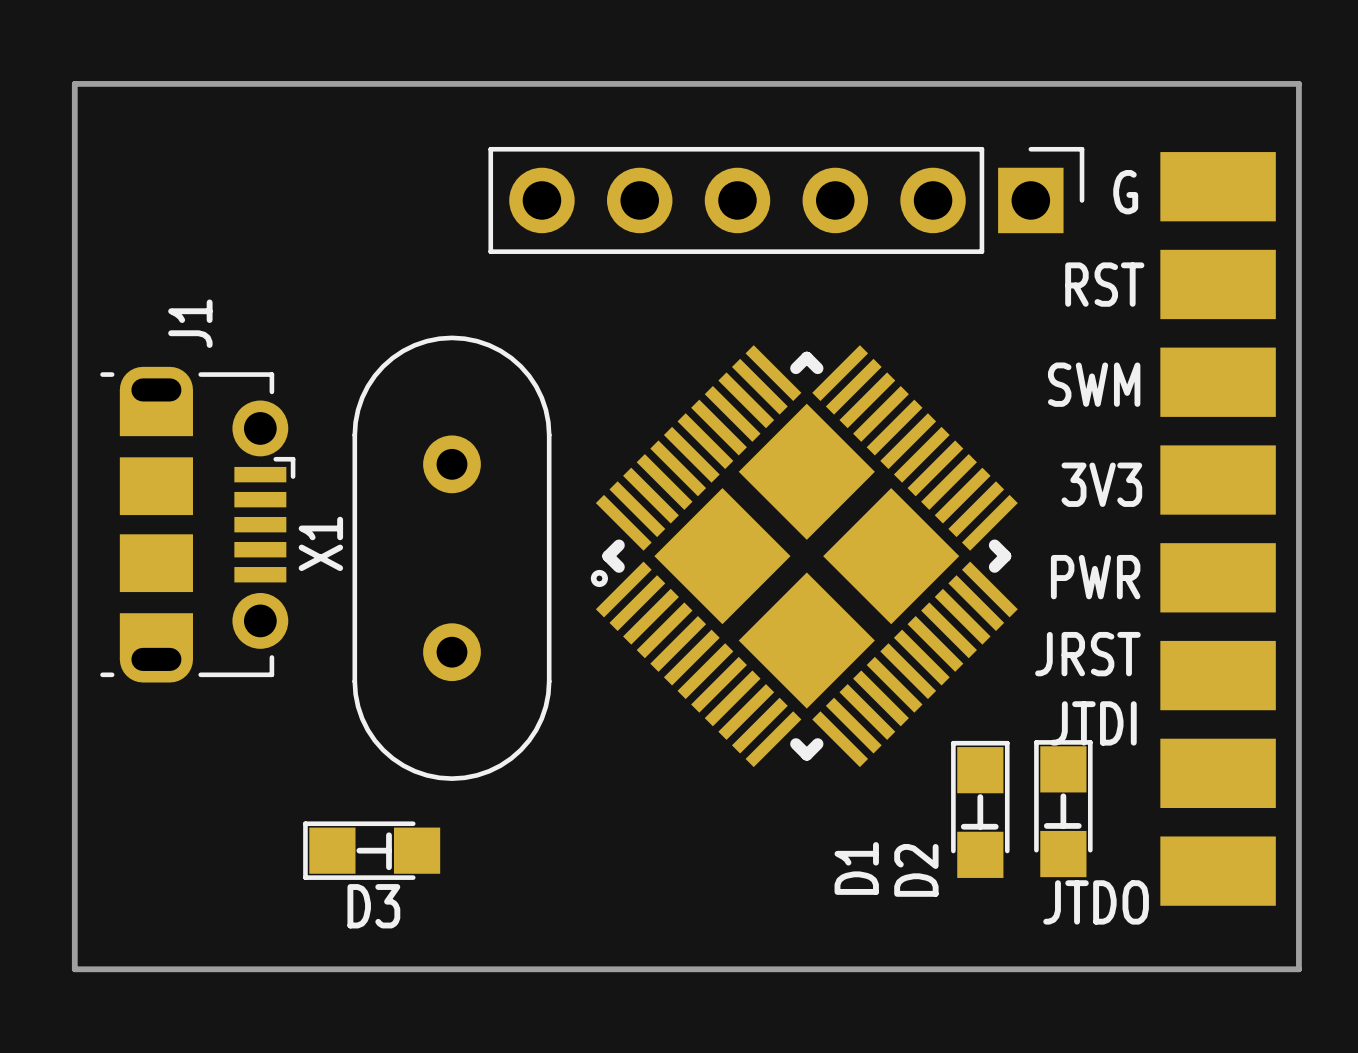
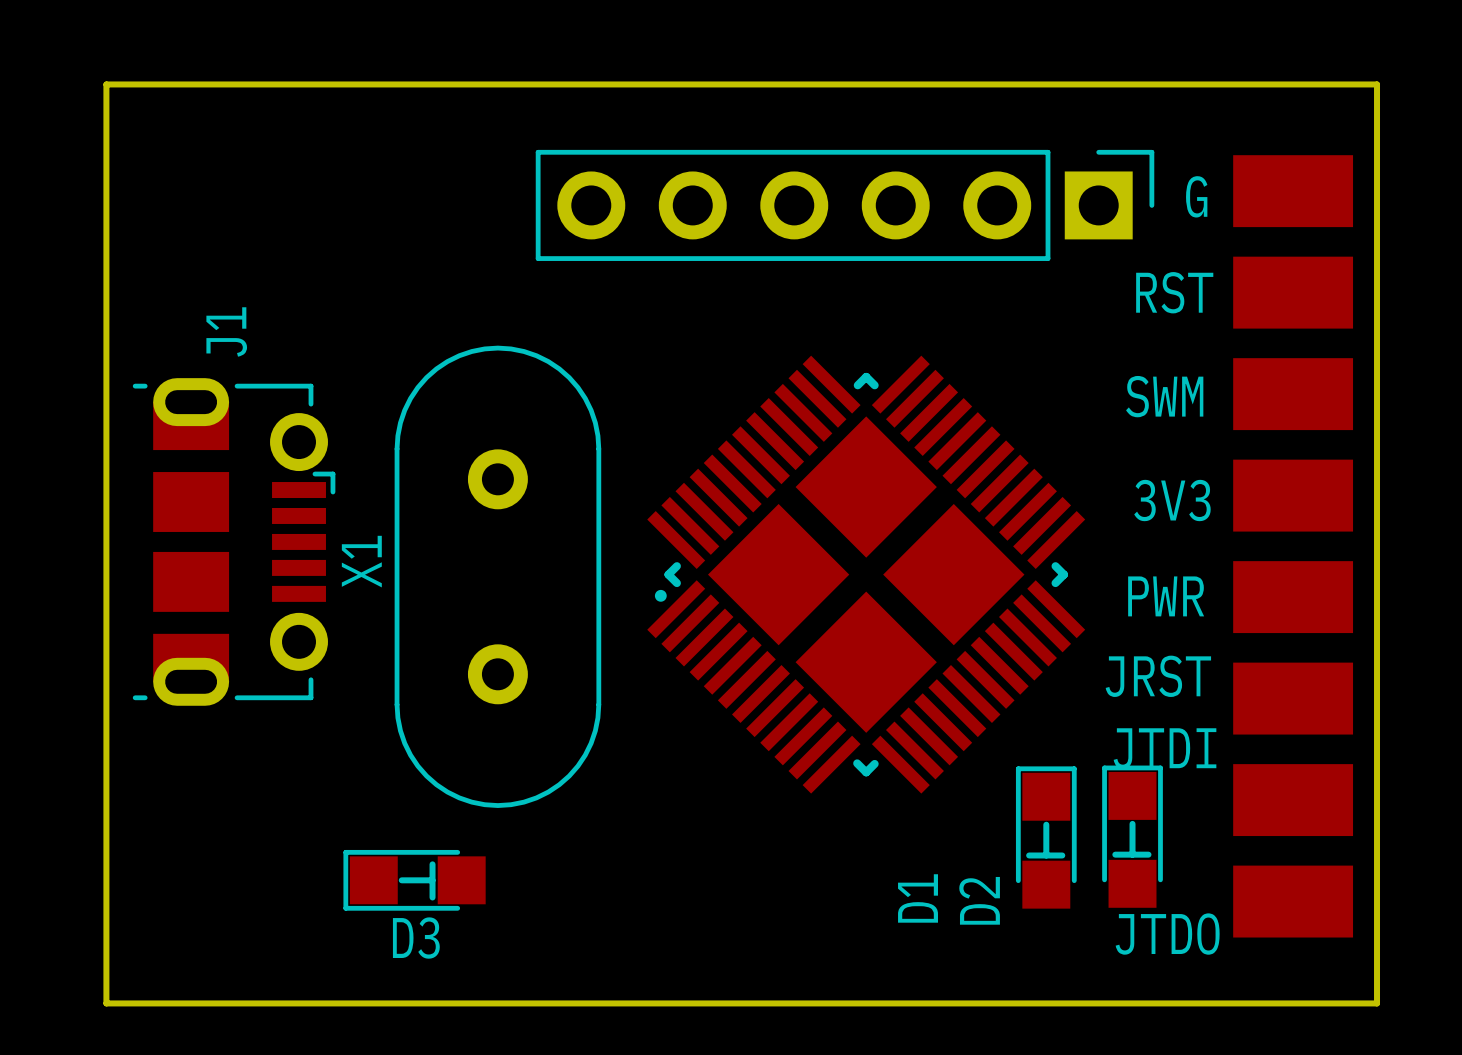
part footprint: [590, 345, 1018, 768] -> [647, 355, 1086, 794]

